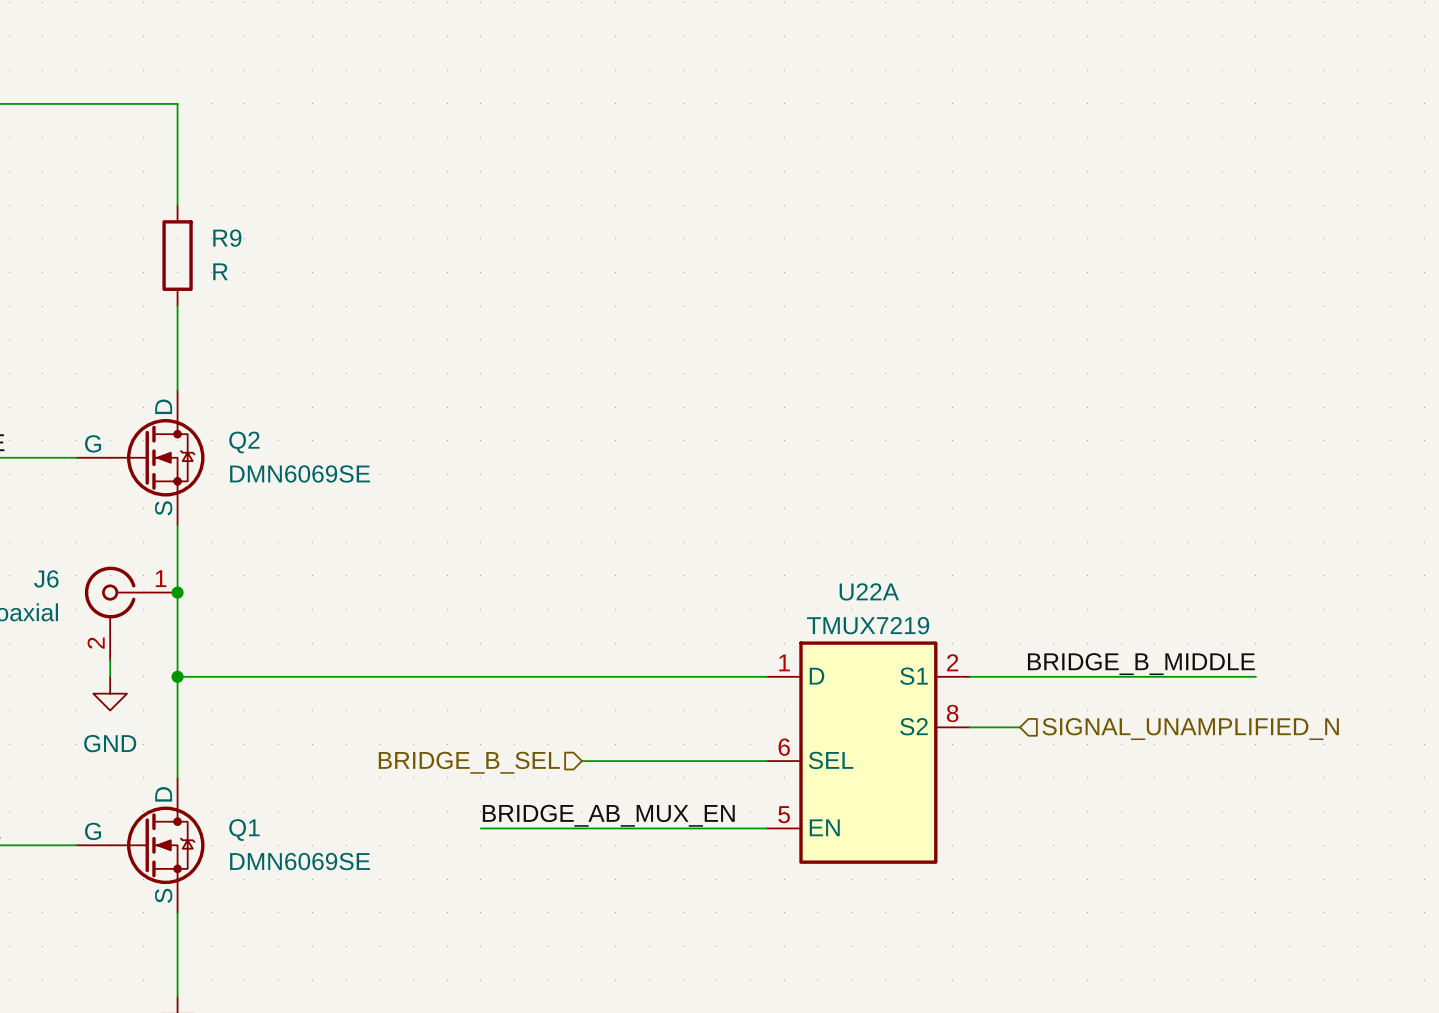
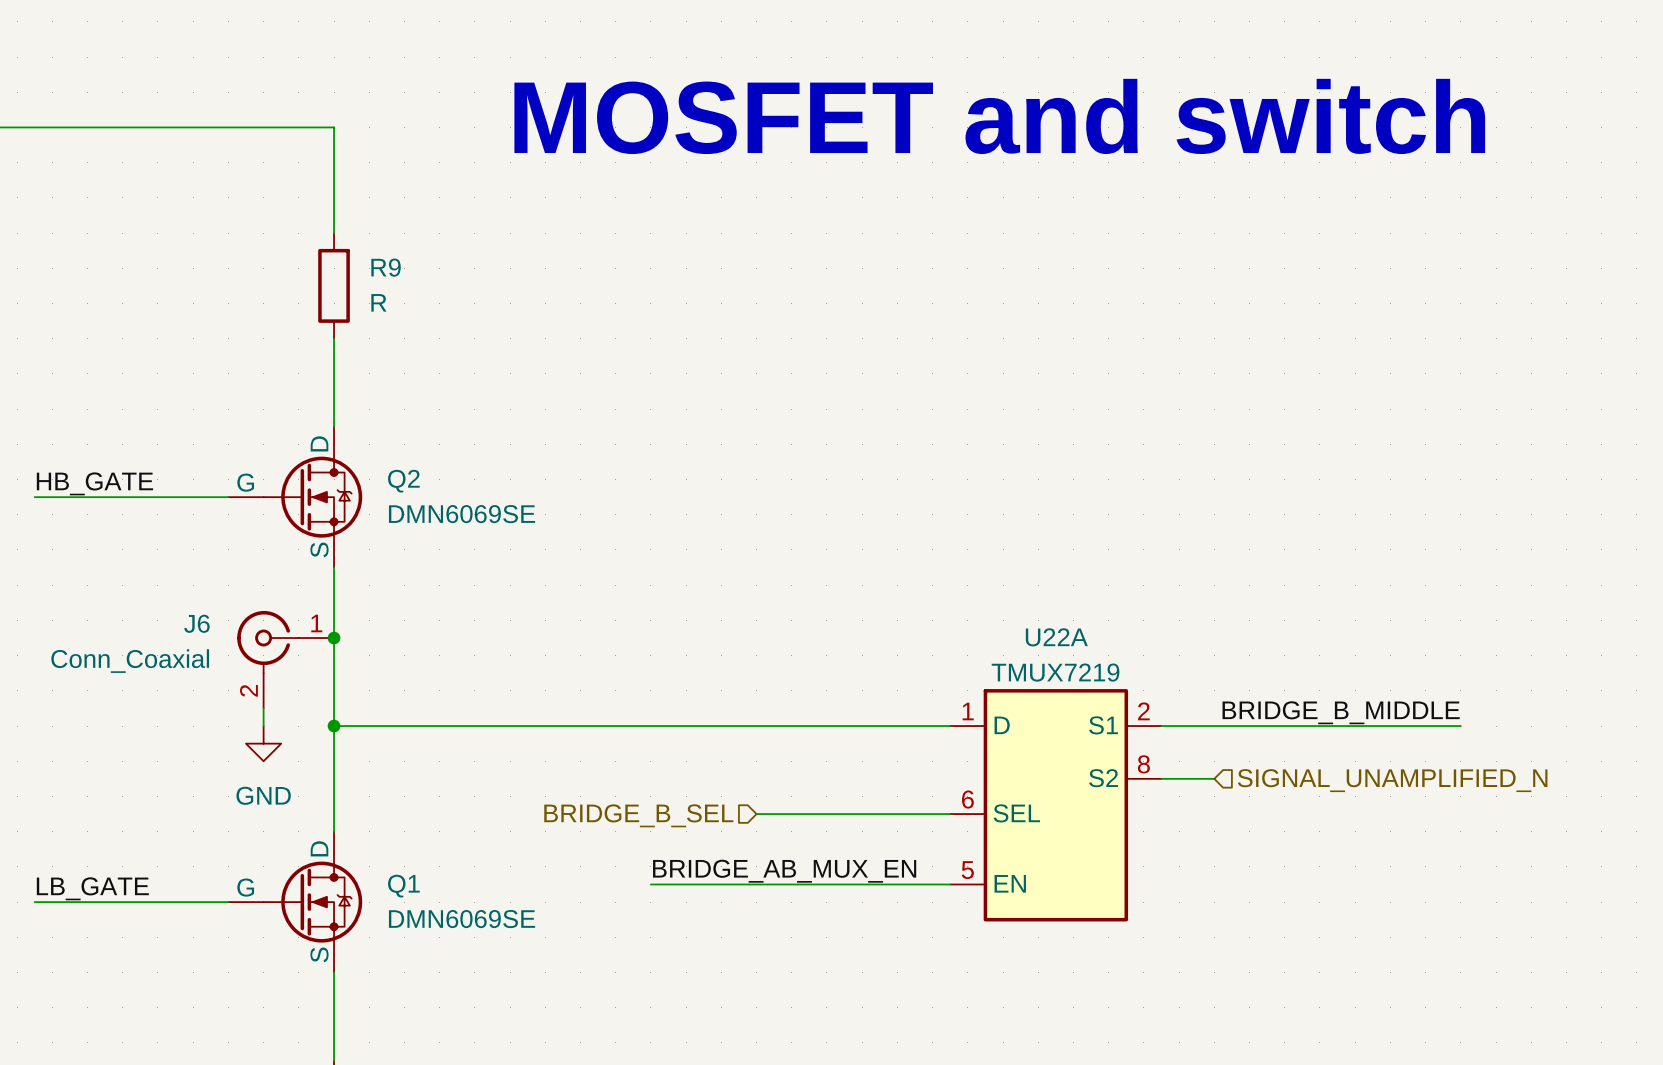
text: none -> MOSFET and switch (999, 116)

